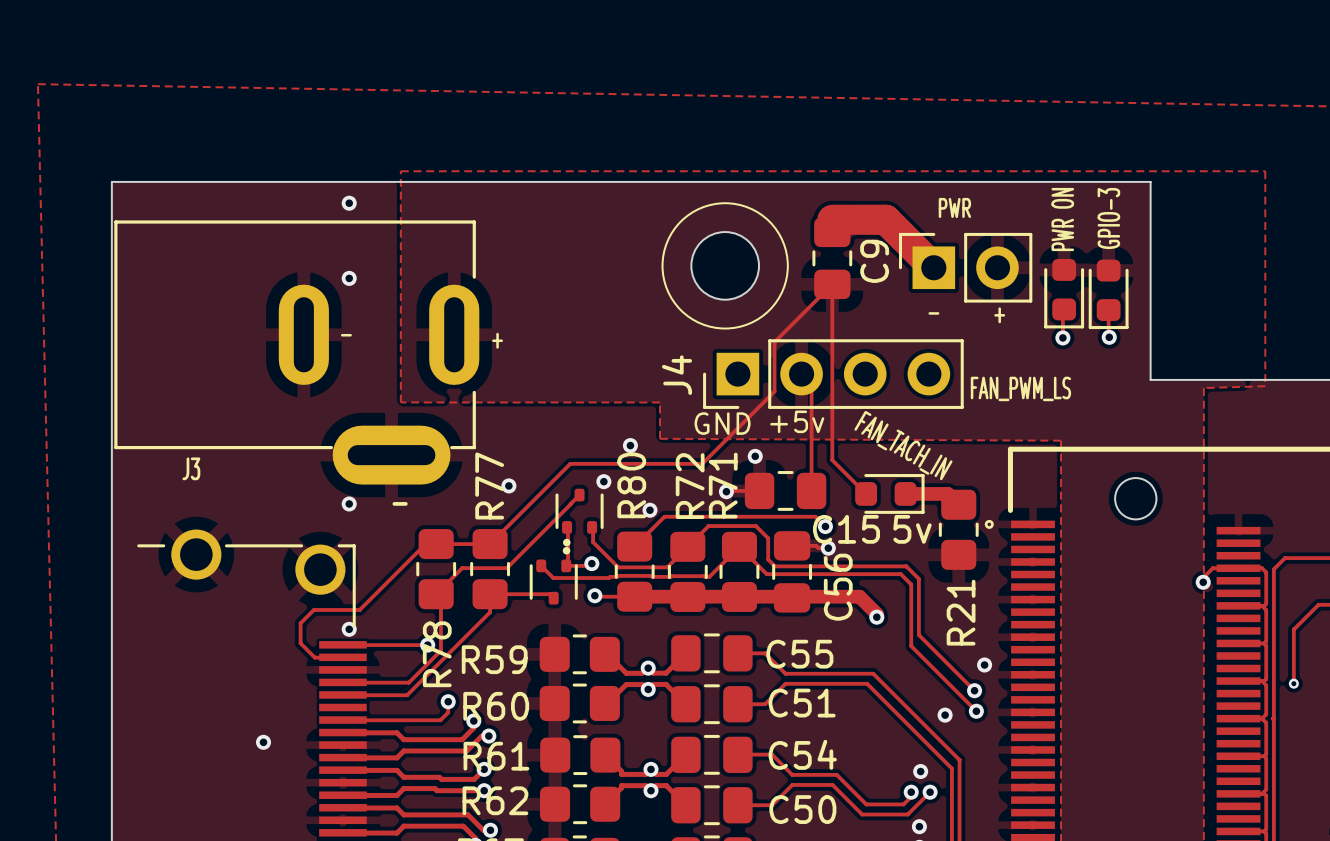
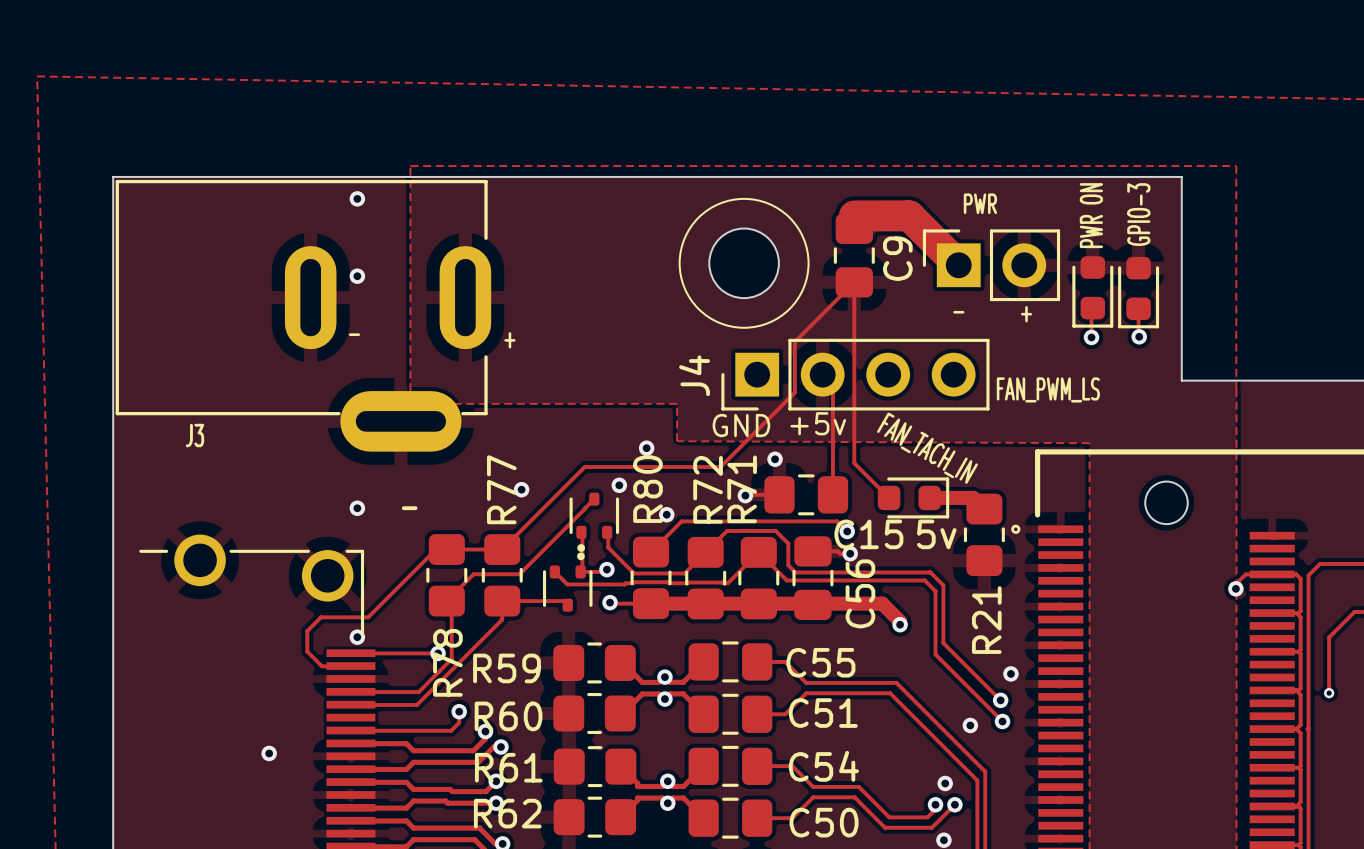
zone outline: (1203, 171) (1265, 171) (1265, 386) (1203, 388) -> (1236, 165) (1236, 389)
J3 position: (296, 352) -> (303, 315)

